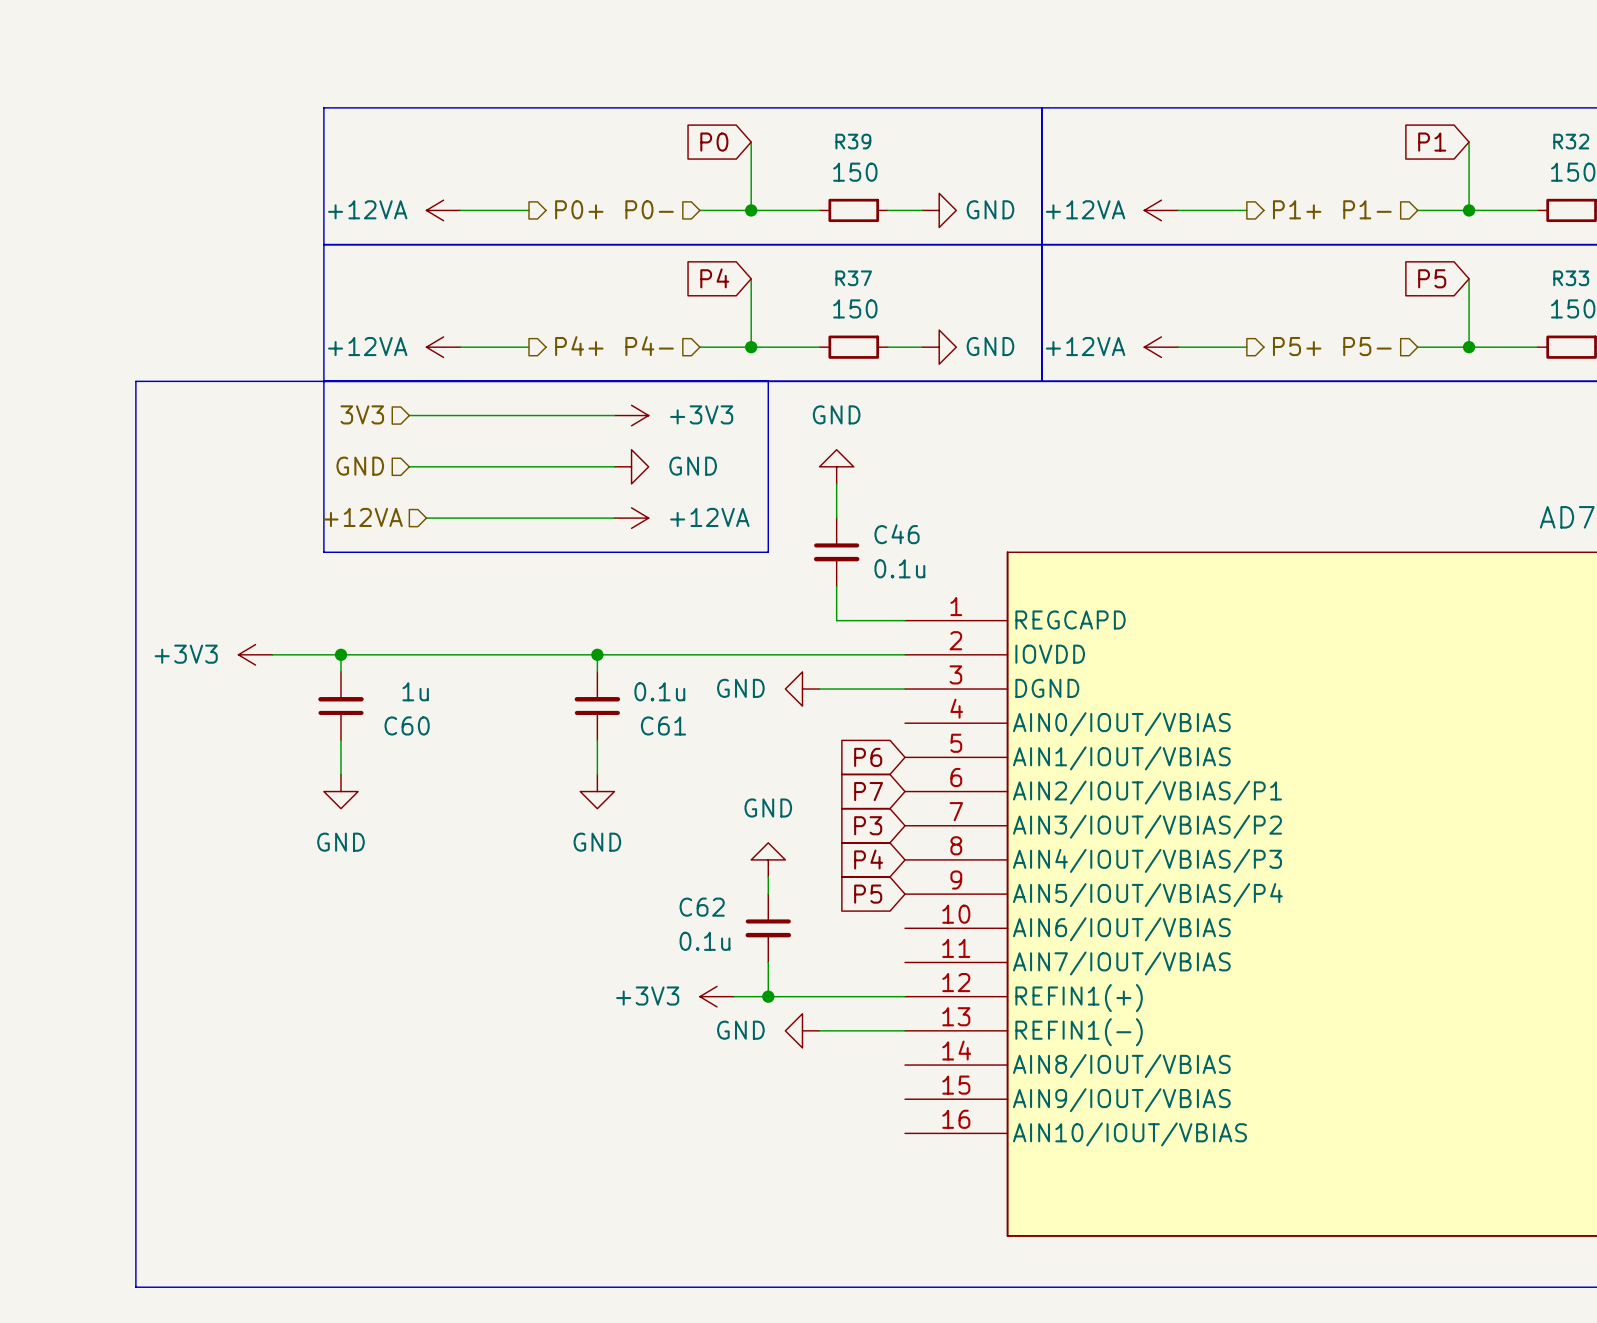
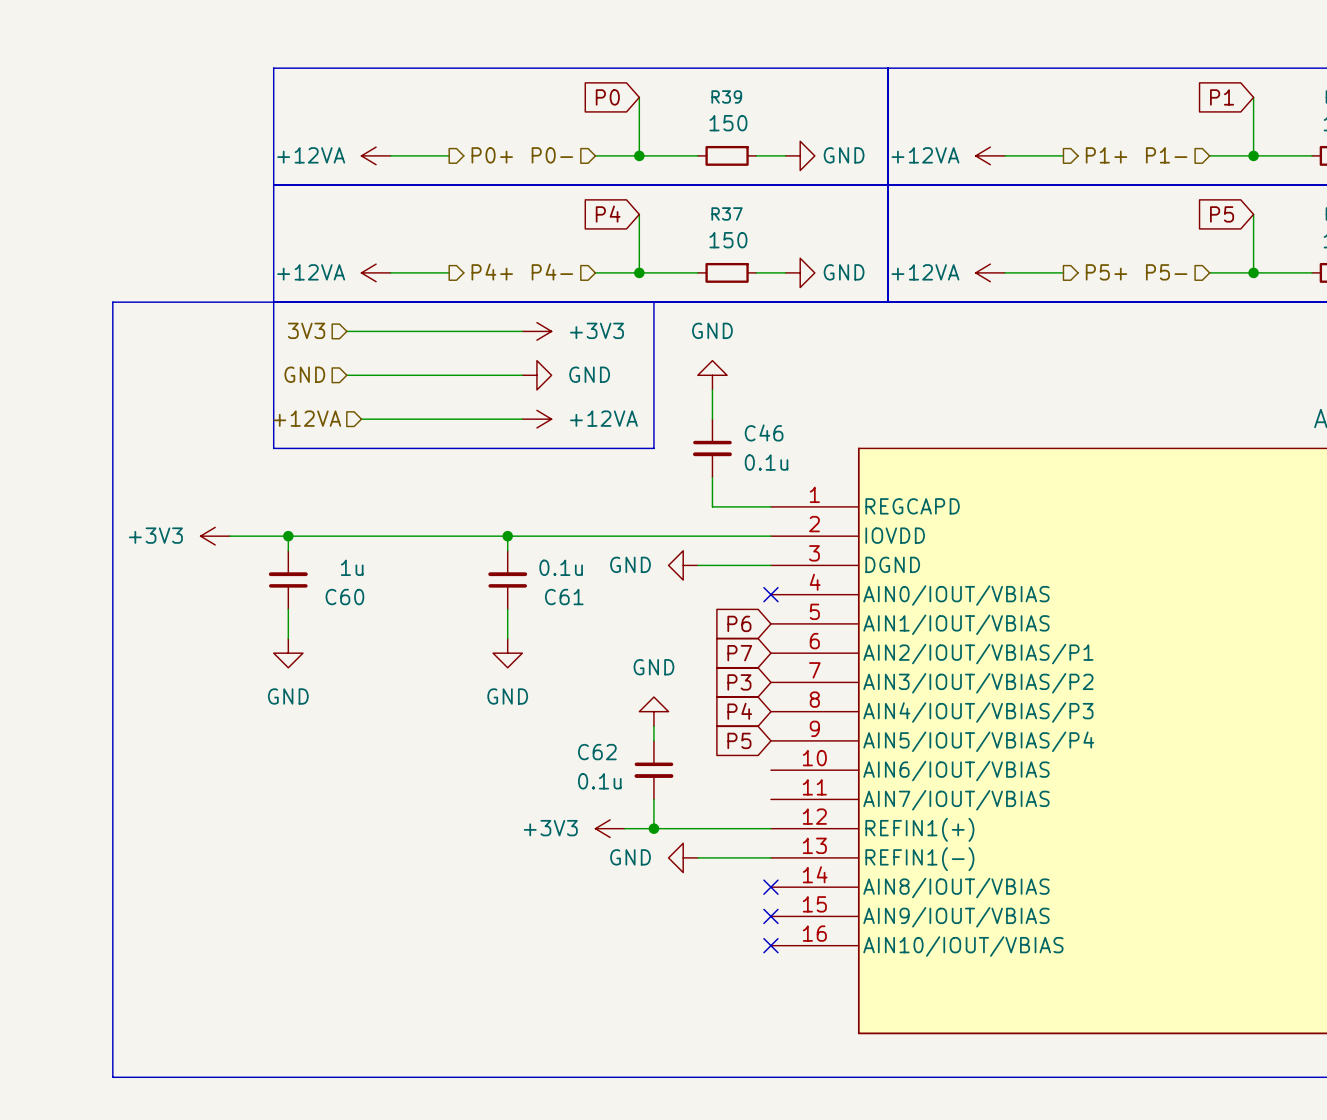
no-connect mark: none -> (770, 594)
no-connect mark: none -> (770, 887)
no-connect mark: none -> (770, 916)
no-connect mark: none -> (770, 945)

